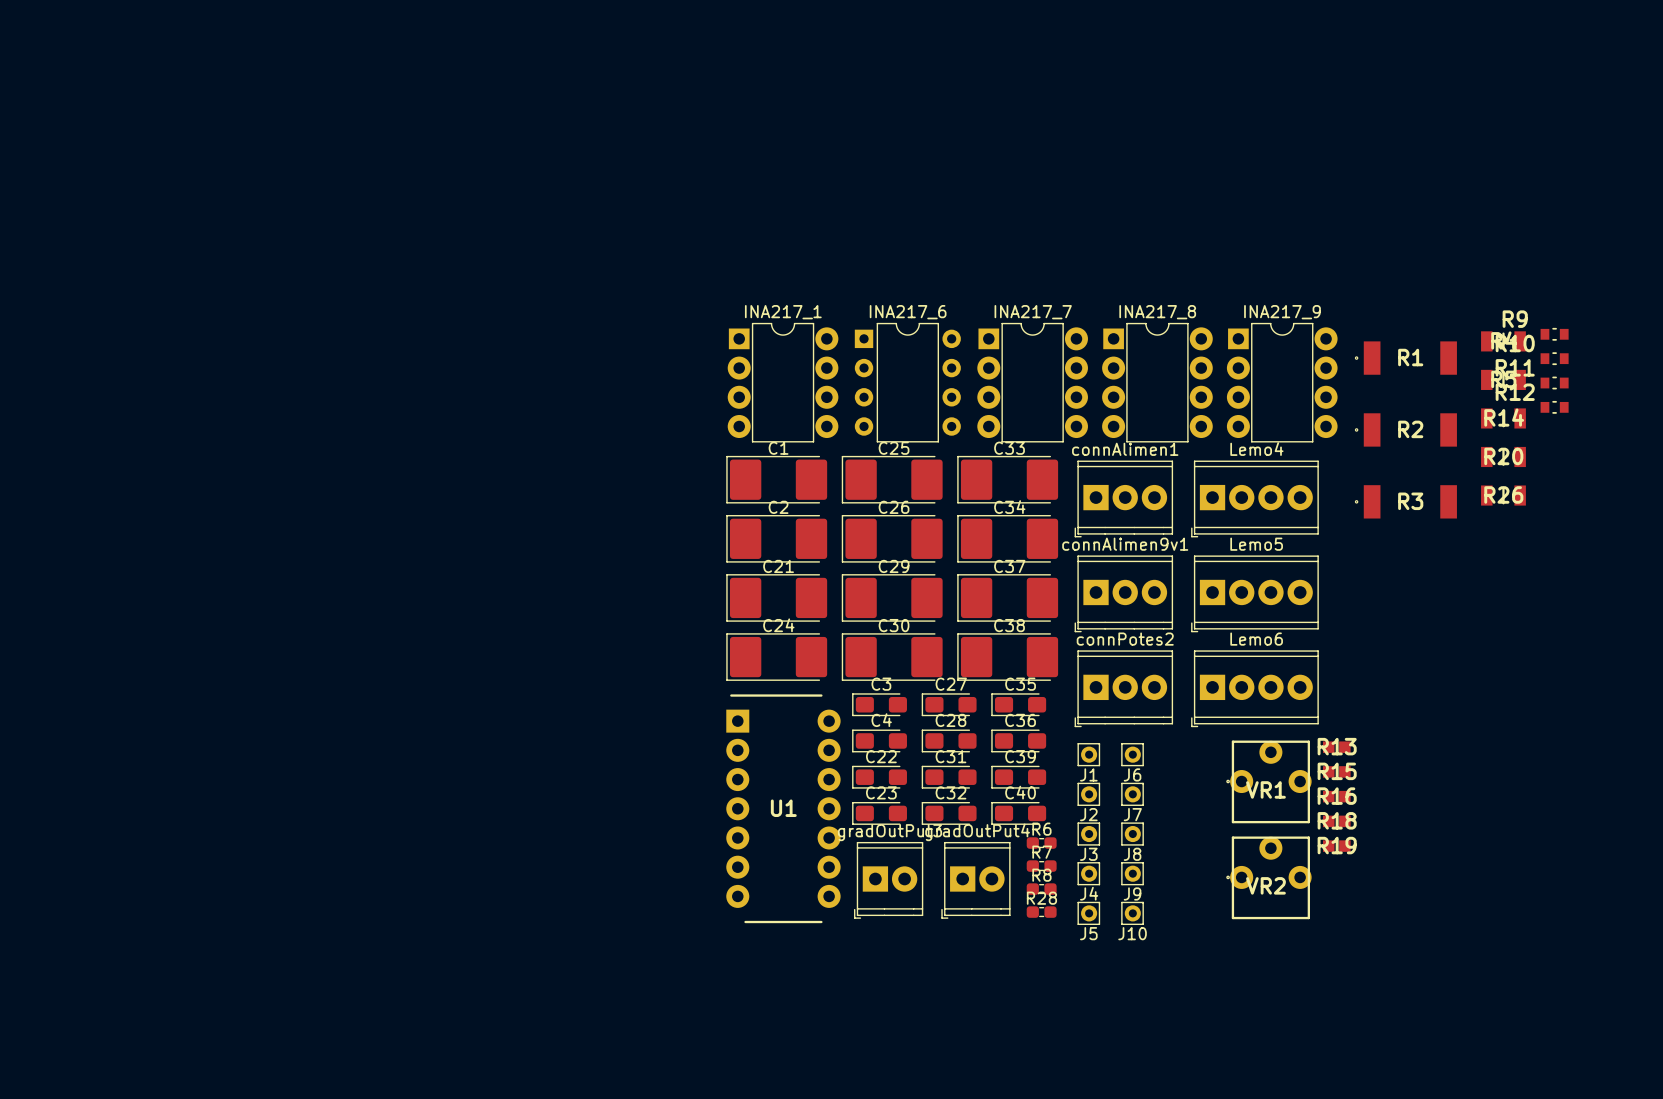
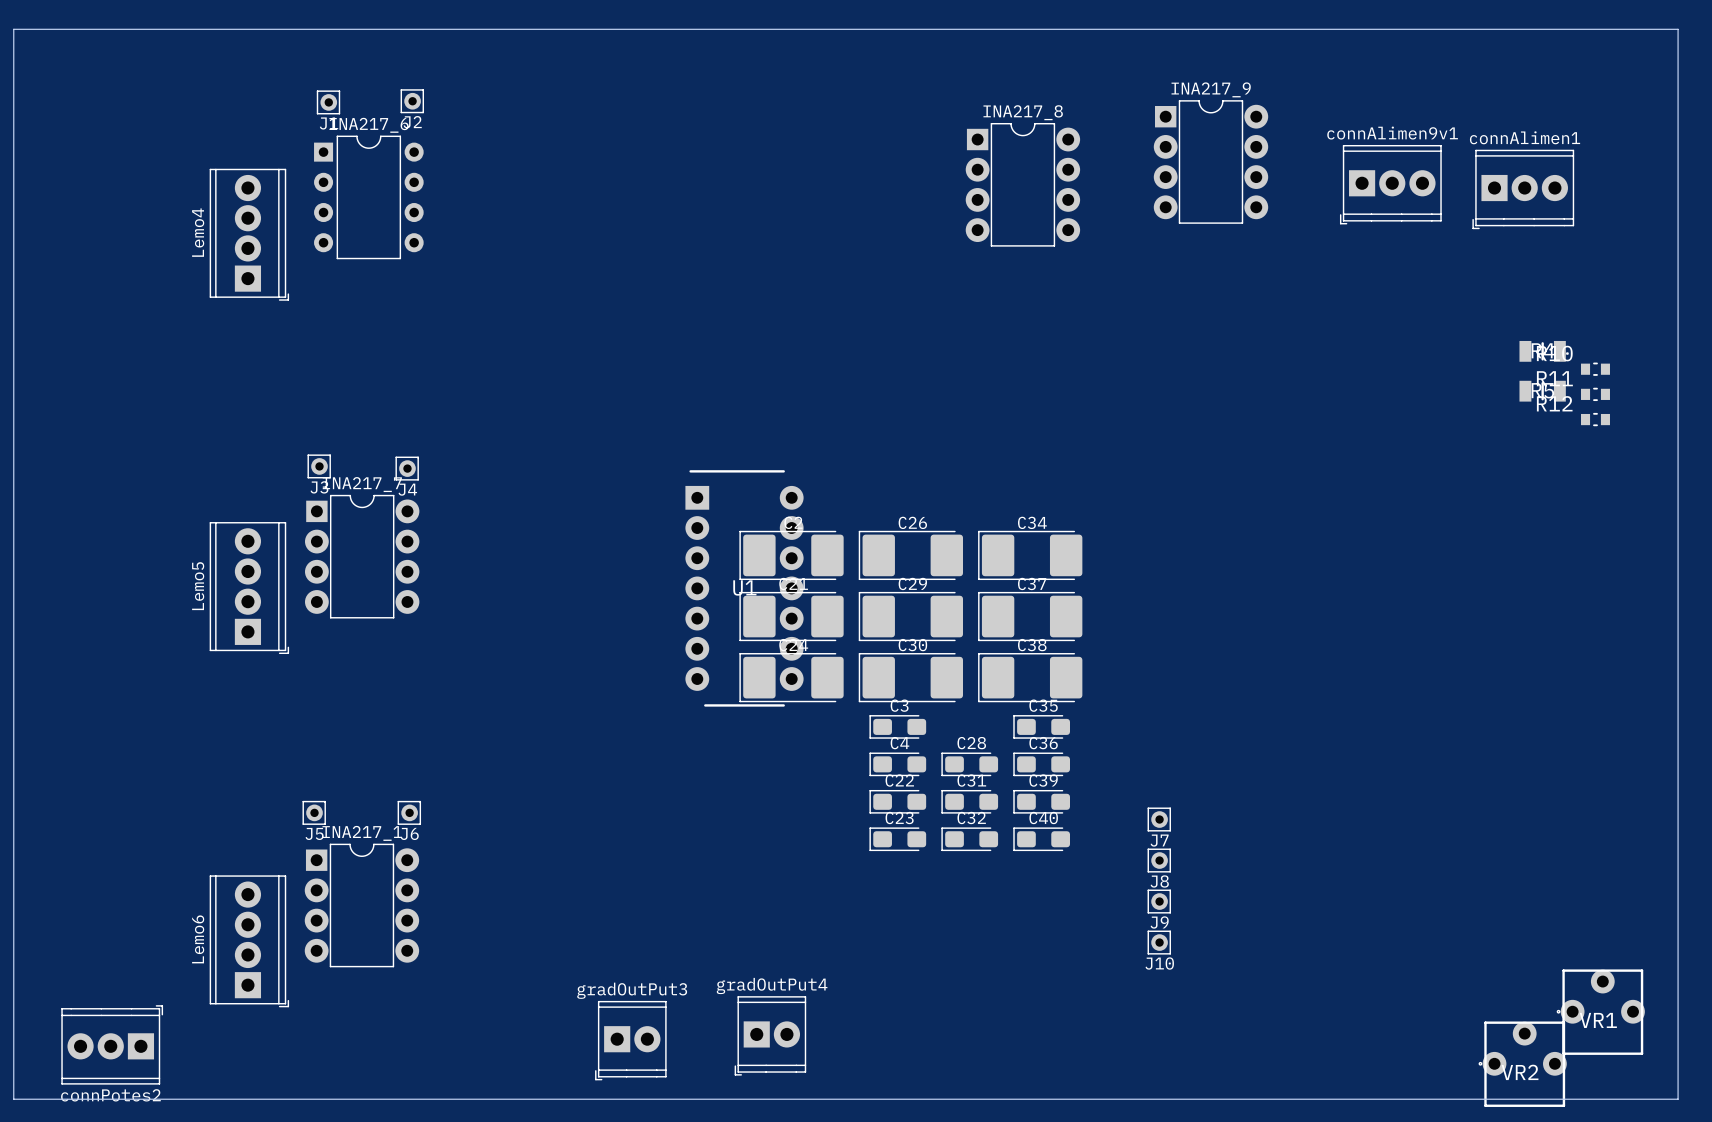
board edge: none -> (13, 29) (1678, 29) (1678, 1099) (13, 1099) (13, 29)
R9: (1554, 334) -> none
R1: (1405, 358) -> none
INA217_1 position: (783, 382) -> (361, 905)
INA217_6 position: (907, 382) -> (368, 197)
INA217_7 position: (1032, 382) -> (362, 556)
INA217_8 position: (1157, 382) -> (1022, 184)
INA217_9 position: (1282, 382) -> (1210, 161)
R14: (1503, 418) -> none
R2: (1405, 429) -> none
R20: (1503, 456) -> none
C1: (776, 479) -> none
C25: (892, 479) -> none
C33: (1007, 479) -> none
R26: (1503, 495) -> none
connAlimen1 position: (1123, 498) -> (1523, 189)
Lemo4 rotation: 0° (1254, 498) -> 90° counterclockwise (249, 234)
Lemo4 position: (1254, 498) -> (249, 234)
R3: (1405, 501) -> none
connAlimen9v1 position: (1123, 593) -> (1390, 184)
Lemo5 rotation: 0° (1254, 593) -> 90° counterclockwise (249, 588)
Lemo5 position: (1254, 593) -> (249, 588)
connPotes2 rotation: 0° (1123, 688) -> 180° (112, 1044)
connPotes2 position: (1123, 688) -> (112, 1044)
Lemo6 rotation: 0° (1254, 688) -> 90° counterclockwise (249, 941)
Lemo6 position: (1254, 688) -> (249, 941)
C27: (949, 704) -> none
R13: (1336, 747) -> none
J1 position: (1088, 754) -> (328, 102)
J6 position: (1132, 754) -> (409, 812)
R15: (1336, 771) -> none
VR1 position: (1268, 781) -> (1600, 1012)
J2 position: (1088, 794) -> (412, 101)
R16: (1336, 796) -> none
U1 position: (783, 808) -> (744, 588)
R18: (1336, 821) -> none
J3 position: (1088, 834) -> (319, 466)
R6: (1041, 843) -> none
R19: (1336, 846) -> none
R7: (1041, 866) -> none
J4 position: (1088, 873) -> (407, 468)
VR2 position: (1268, 877) -> (1522, 1064)
gradOutPut3 position: (888, 880) -> (630, 1040)
gradOutPut4 position: (975, 880) -> (770, 1035)
R8: (1041, 889) -> none
R28: (1041, 912) -> none
J5 position: (1088, 913) -> (314, 812)

